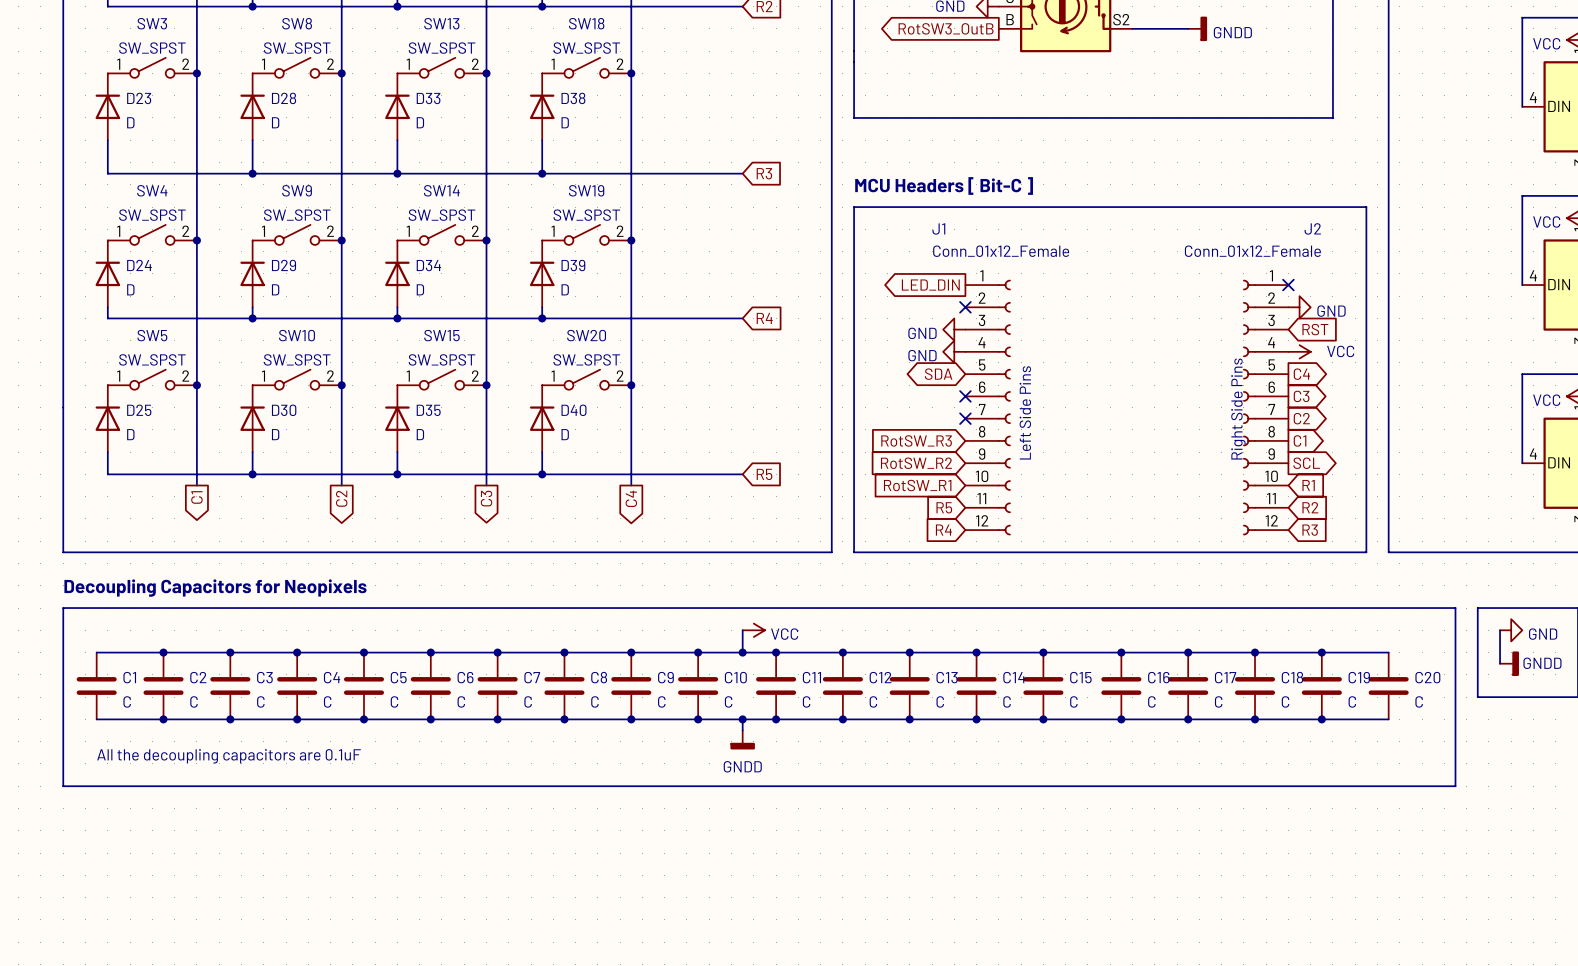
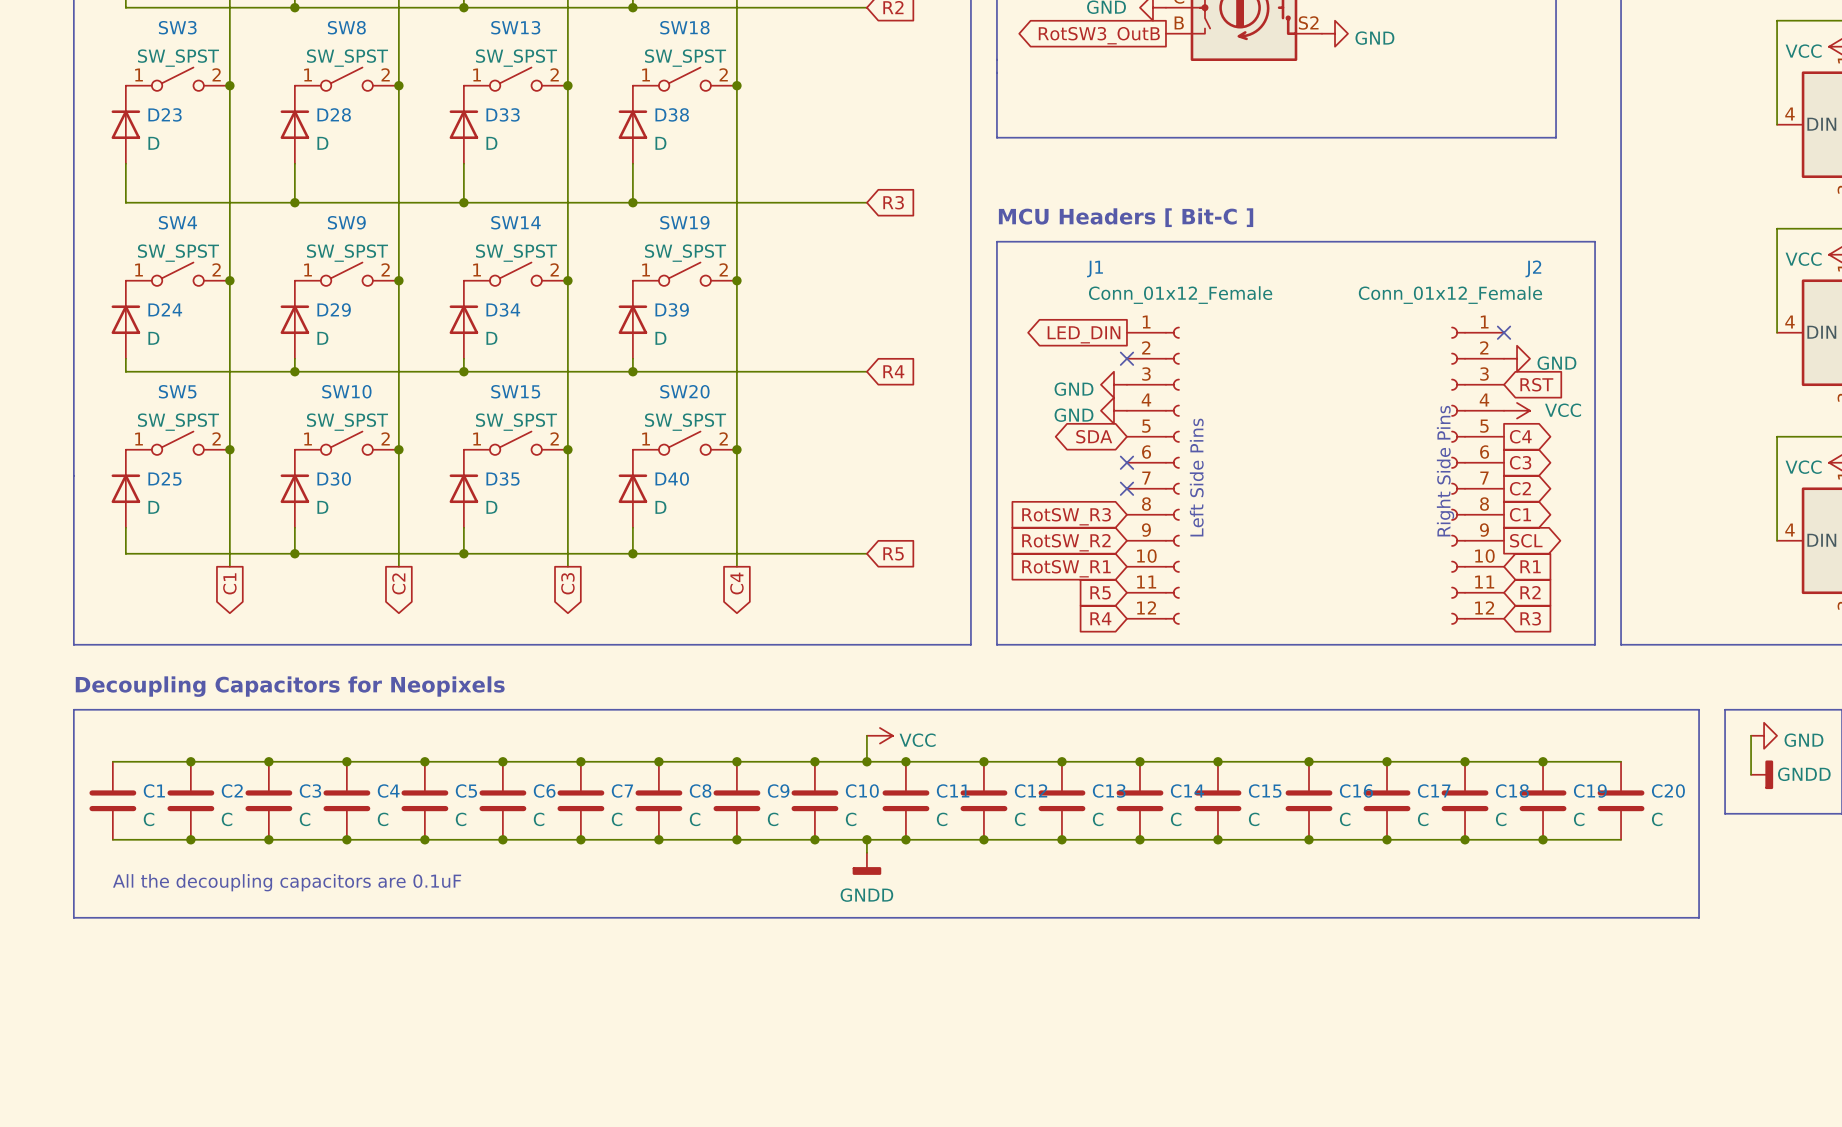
wire: (1132, 28) (1188, 28) -> none
power symbol: none -> GND (1335, 33)
power symbol: GNDD (1197, 28) -> none

